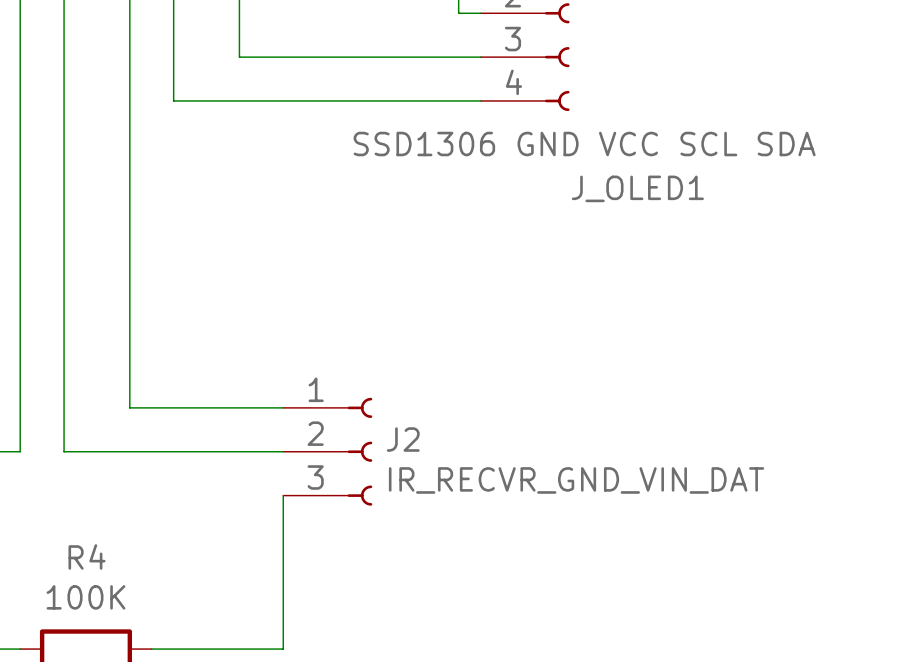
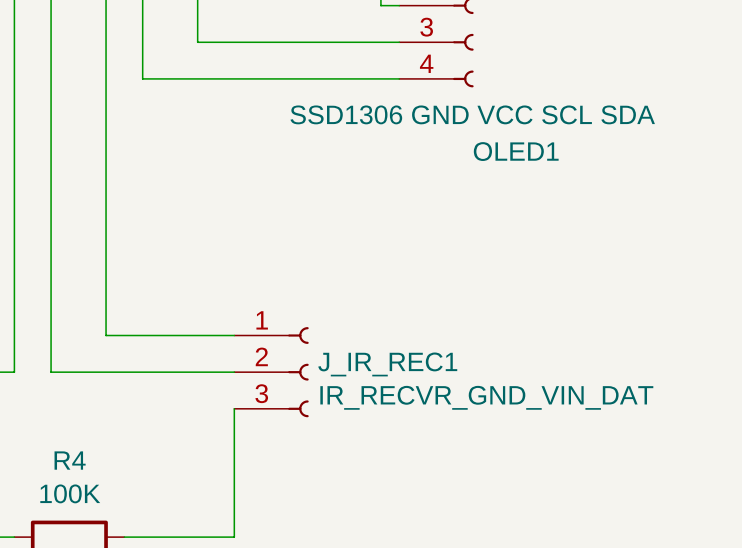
J_OLED1 name: J_OLED1 (637, 188) -> OLED1 (516, 151)
J2 name: J2 (403, 439) -> J_IR_REC1 (387, 364)

